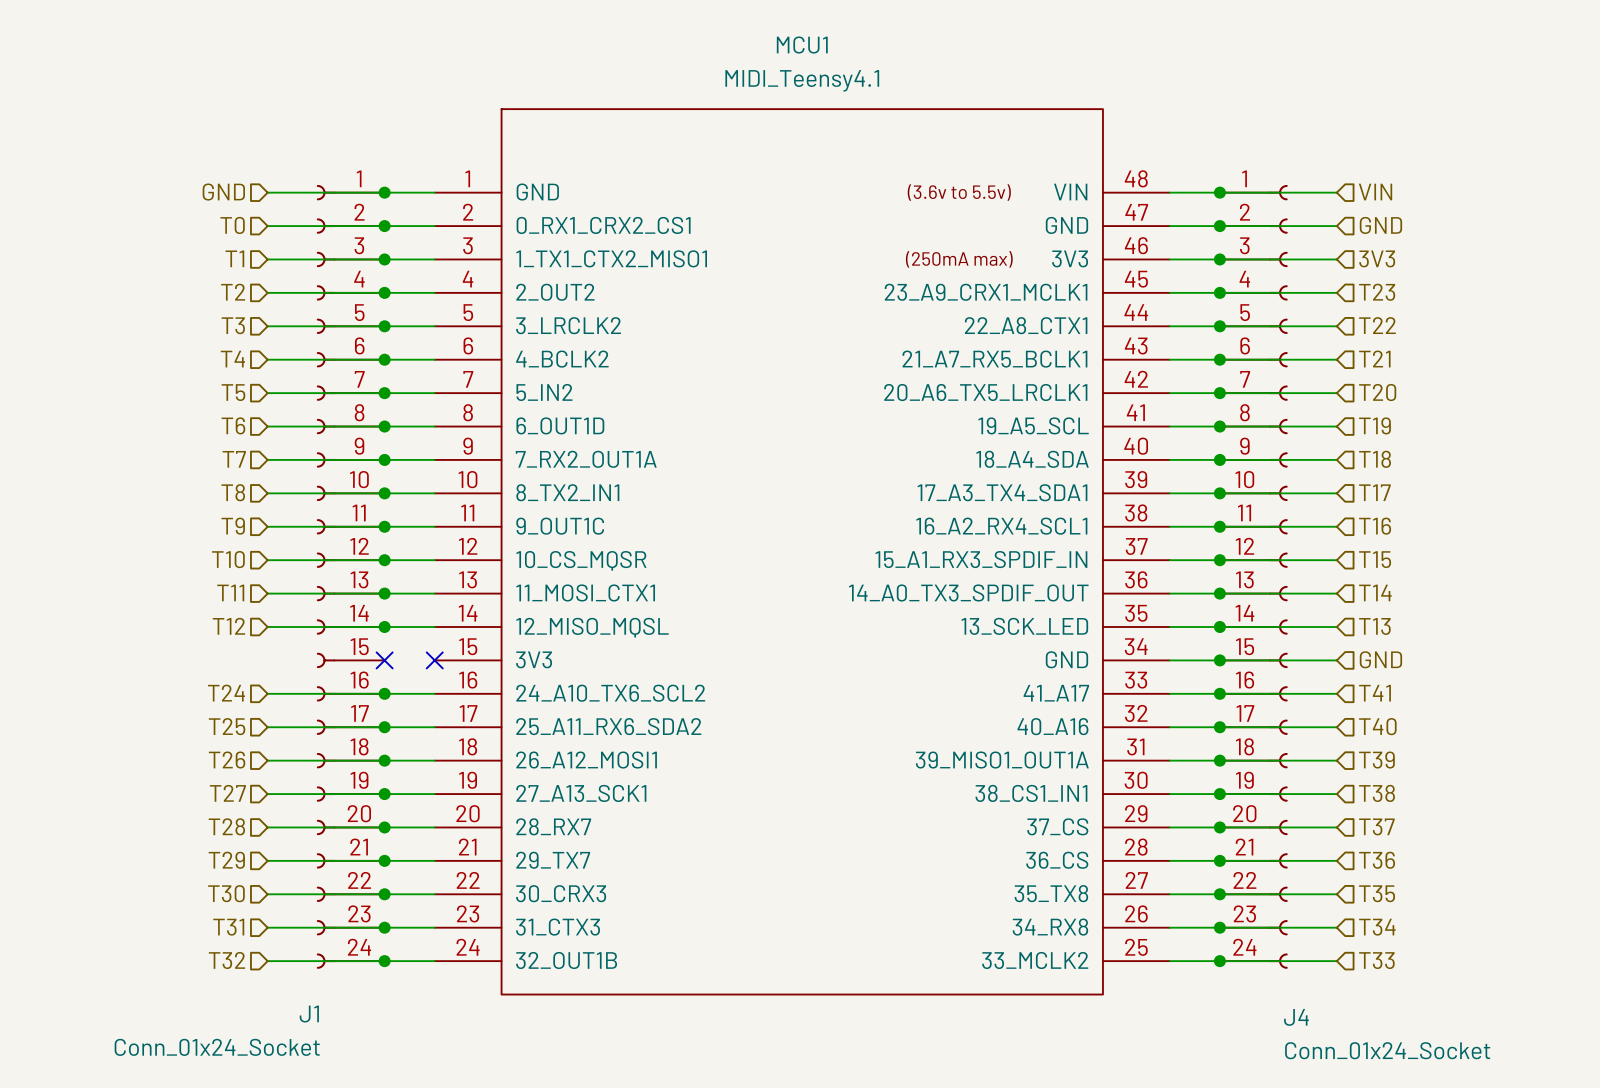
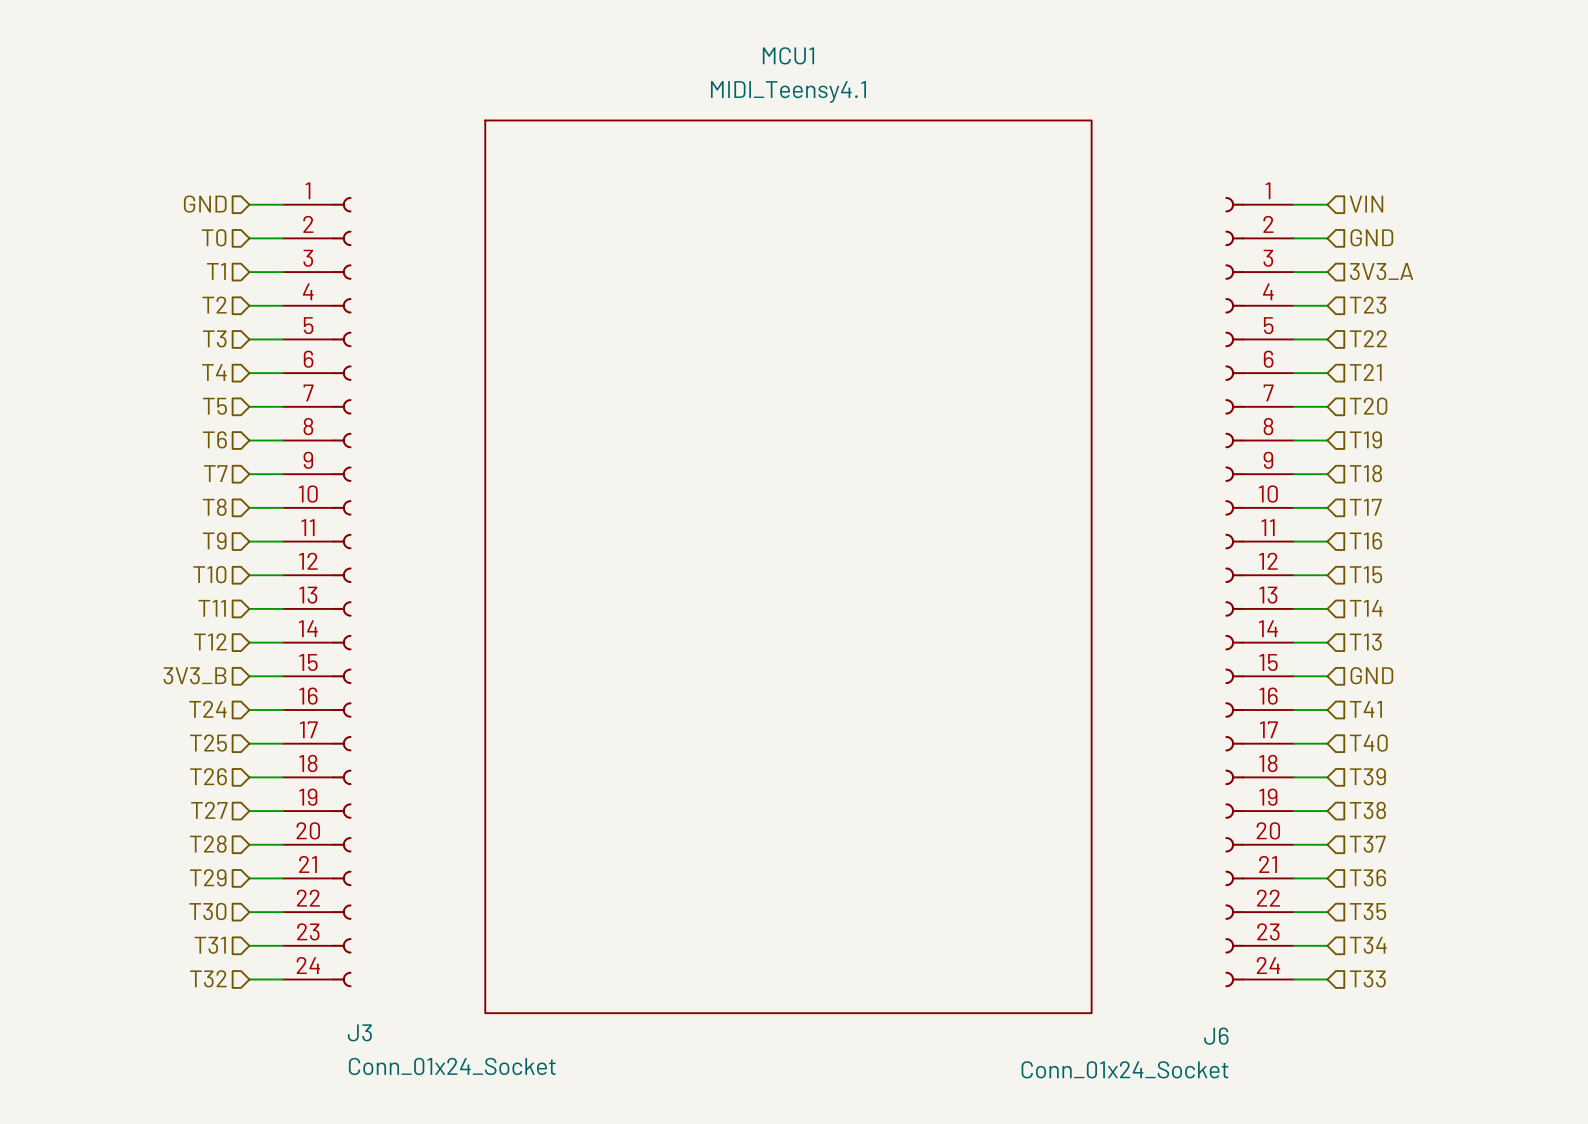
MCU1 symbol: [434, 109, 1170, 995] -> [485, 120, 1092, 1014]
wire: (301, 192) (434, 192) -> none
junction: (384, 192) -> none
wire: (1169, 192) (1303, 192) -> none
junction: (1219, 192) -> none
wire: (301, 226) (434, 226) -> none
junction: (384, 226) -> none
wire: (1169, 226) (1303, 226) -> none
junction: (1219, 226) -> none
hierarchical label: 3V3 (1377, 258) -> 3V3_A (1381, 271)
wire: (301, 259) (434, 259) -> none
junction: (384, 259) -> none
wire: (1169, 259) (1303, 259) -> none
junction: (1219, 259) -> none
wire: (301, 292) (434, 292) -> none
junction: (384, 292) -> none
wire: (1169, 292) (1303, 292) -> none
junction: (1219, 292) -> none
wire: (301, 326) (434, 326) -> none
junction: (384, 326) -> none
wire: (1169, 326) (1303, 326) -> none
junction: (1219, 326) -> none
wire: (301, 359) (434, 359) -> none
junction: (384, 359) -> none
wire: (1169, 359) (1303, 359) -> none
junction: (1219, 359) -> none
wire: (301, 393) (434, 393) -> none
junction: (384, 393) -> none
wire: (1169, 393) (1303, 393) -> none
junction: (1219, 393) -> none
wire: (301, 426) (434, 426) -> none
junction: (384, 426) -> none
wire: (1169, 426) (1303, 426) -> none
junction: (1219, 426) -> none
wire: (301, 459) (434, 459) -> none
junction: (384, 459) -> none
wire: (1169, 459) (1303, 459) -> none
junction: (1219, 459) -> none
wire: (301, 493) (434, 493) -> none
junction: (384, 493) -> none
wire: (1169, 493) (1303, 493) -> none
junction: (1219, 493) -> none
wire: (301, 526) (434, 526) -> none
junction: (384, 526) -> none
wire: (1169, 526) (1303, 526) -> none
junction: (1219, 526) -> none
wire: (301, 560) (434, 560) -> none
junction: (384, 560) -> none
wire: (1169, 560) (1303, 560) -> none
junction: (1219, 560) -> none
J3: none -> Conn_01x24_Socket (317, 592)
J1: Conn_01x24_Socket (350, 576) -> none
J4: Conn_01x24_Socket (1253, 576) -> none
J6: none -> Conn_01x24_Socket (1259, 592)
wire: (301, 593) (434, 593) -> none
junction: (384, 593) -> none
wire: (1169, 593) (1303, 593) -> none
junction: (1219, 593) -> none
wire: (301, 627) (434, 627) -> none
junction: (384, 627) -> none
wire: (1169, 627) (1303, 627) -> none
junction: (1219, 627) -> none
hierarchical label: none -> 3V3_B (194, 675)
wire: none -> (249, 676) (283, 676)
no-connect mark: (384, 660) -> none
no-connect mark: (434, 660) -> none
wire: (1169, 660) (1303, 660) -> none
junction: (1219, 660) -> none
wire: (301, 693) (434, 693) -> none
junction: (384, 693) -> none
wire: (1169, 693) (1303, 693) -> none
junction: (1219, 693) -> none
wire: (301, 727) (434, 727) -> none
junction: (384, 727) -> none
wire: (1169, 727) (1303, 727) -> none
junction: (1219, 727) -> none
wire: (301, 760) (434, 760) -> none
junction: (384, 760) -> none
wire: (1169, 760) (1303, 760) -> none
junction: (1219, 760) -> none
wire: (301, 794) (434, 794) -> none
junction: (384, 794) -> none
wire: (1169, 794) (1303, 794) -> none
junction: (1219, 794) -> none
wire: (301, 827) (434, 827) -> none
junction: (384, 827) -> none
wire: (1169, 827) (1303, 827) -> none
junction: (1219, 827) -> none
wire: (301, 860) (434, 860) -> none
junction: (384, 860) -> none
wire: (1169, 860) (1303, 860) -> none
junction: (1219, 860) -> none
wire: (301, 894) (434, 894) -> none
junction: (384, 894) -> none
wire: (1169, 894) (1303, 894) -> none
junction: (1219, 894) -> none
wire: (301, 927) (434, 927) -> none
junction: (384, 927) -> none
wire: (1169, 927) (1303, 927) -> none
junction: (1219, 927) -> none
wire: (301, 961) (434, 961) -> none
junction: (384, 961) -> none
wire: (1169, 961) (1303, 961) -> none
junction: (1219, 961) -> none

